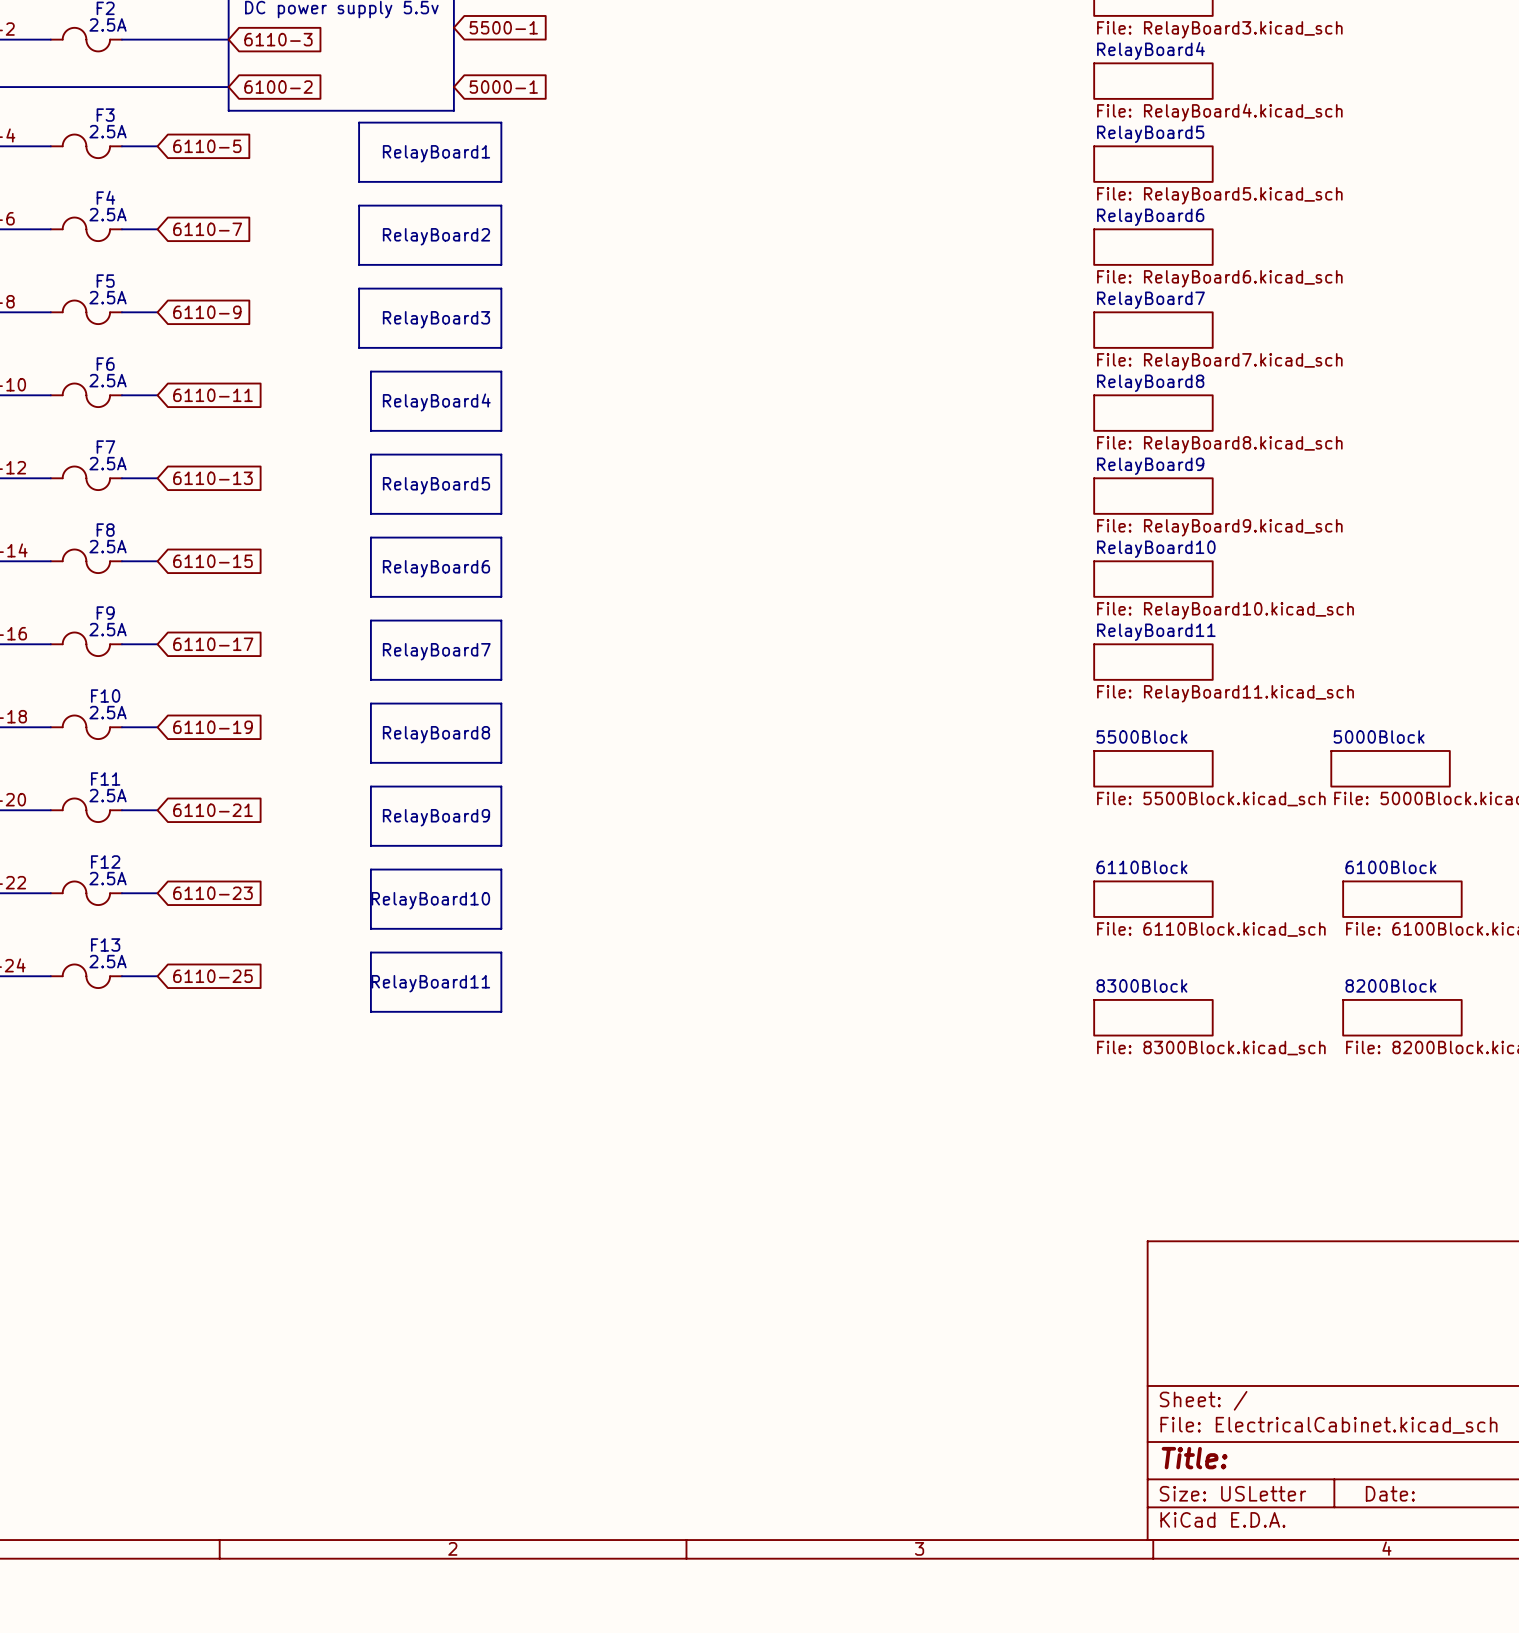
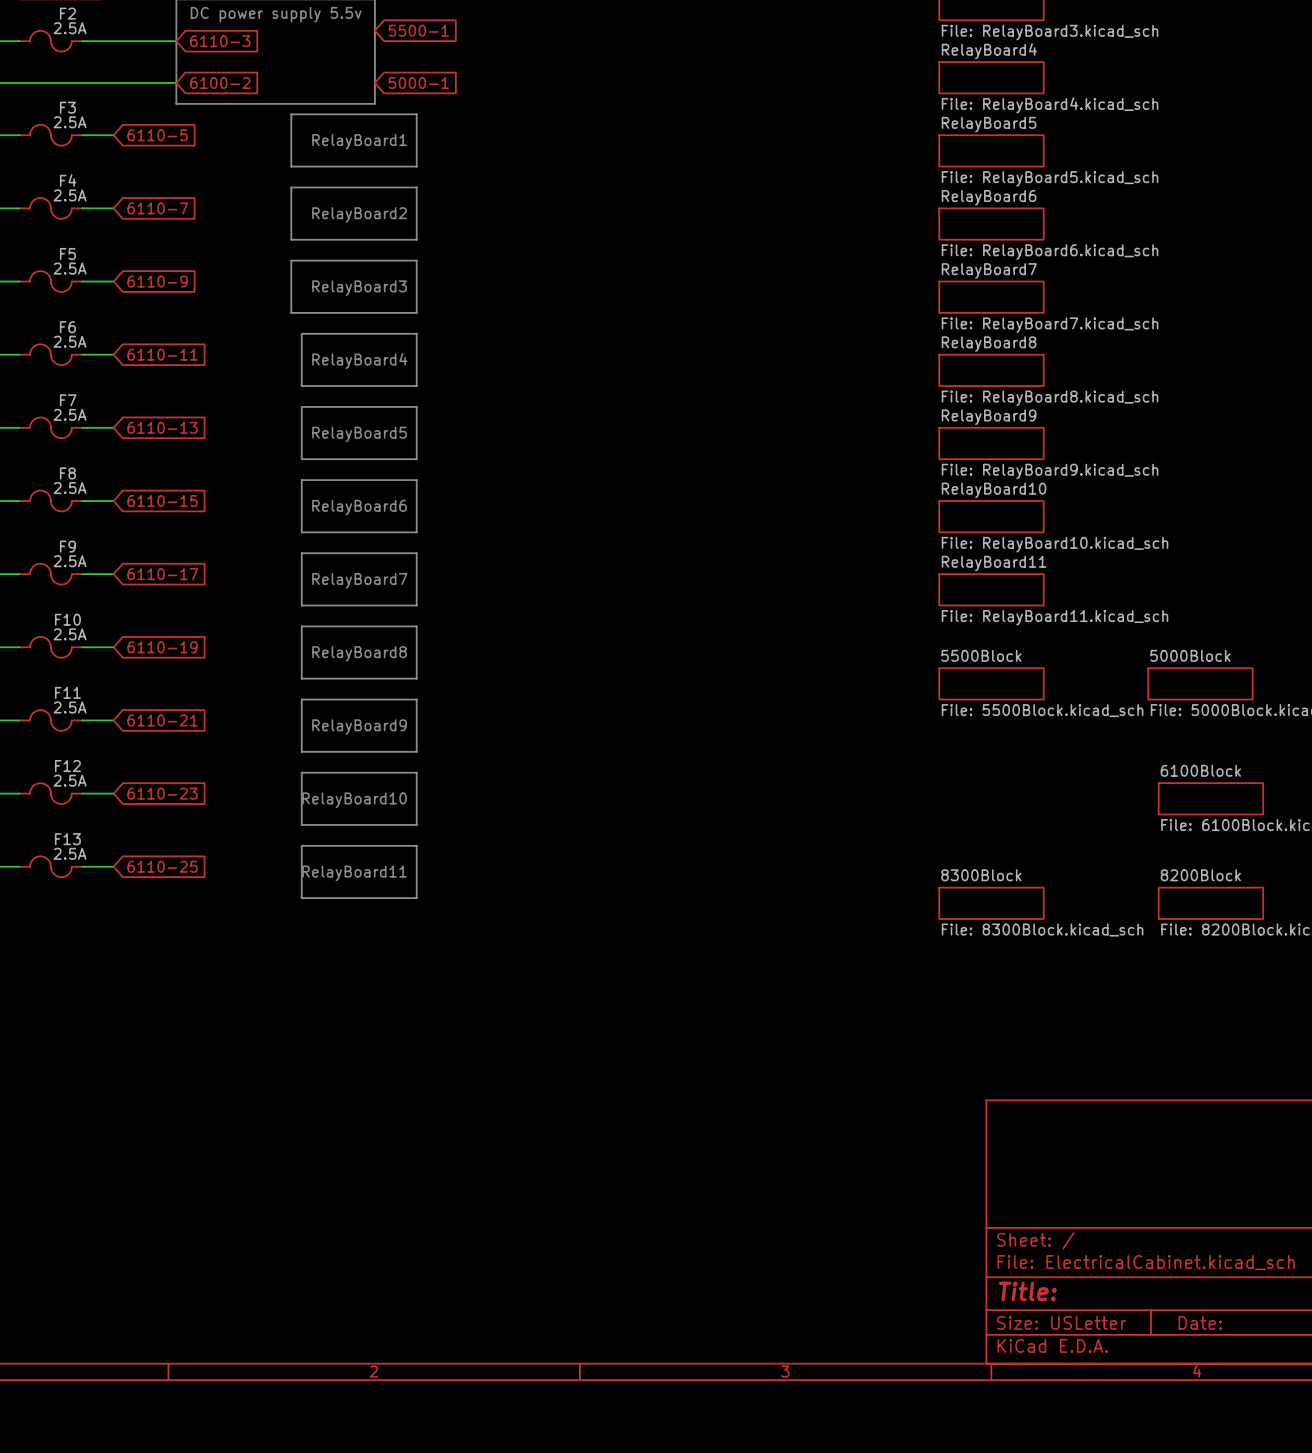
sheet 6110Block: File: 6110Block.kicad_sch (1153, 899) -> none

